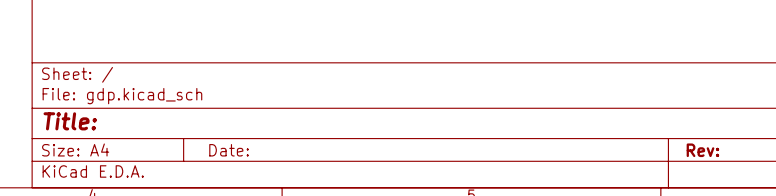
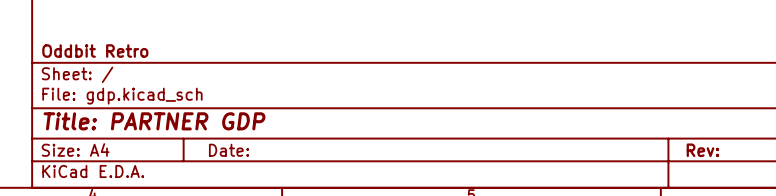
title block: none -> Oddbit Retro (95, 51)
title block: Title: (70, 121) -> Title: PARTNER GDP (154, 121)

